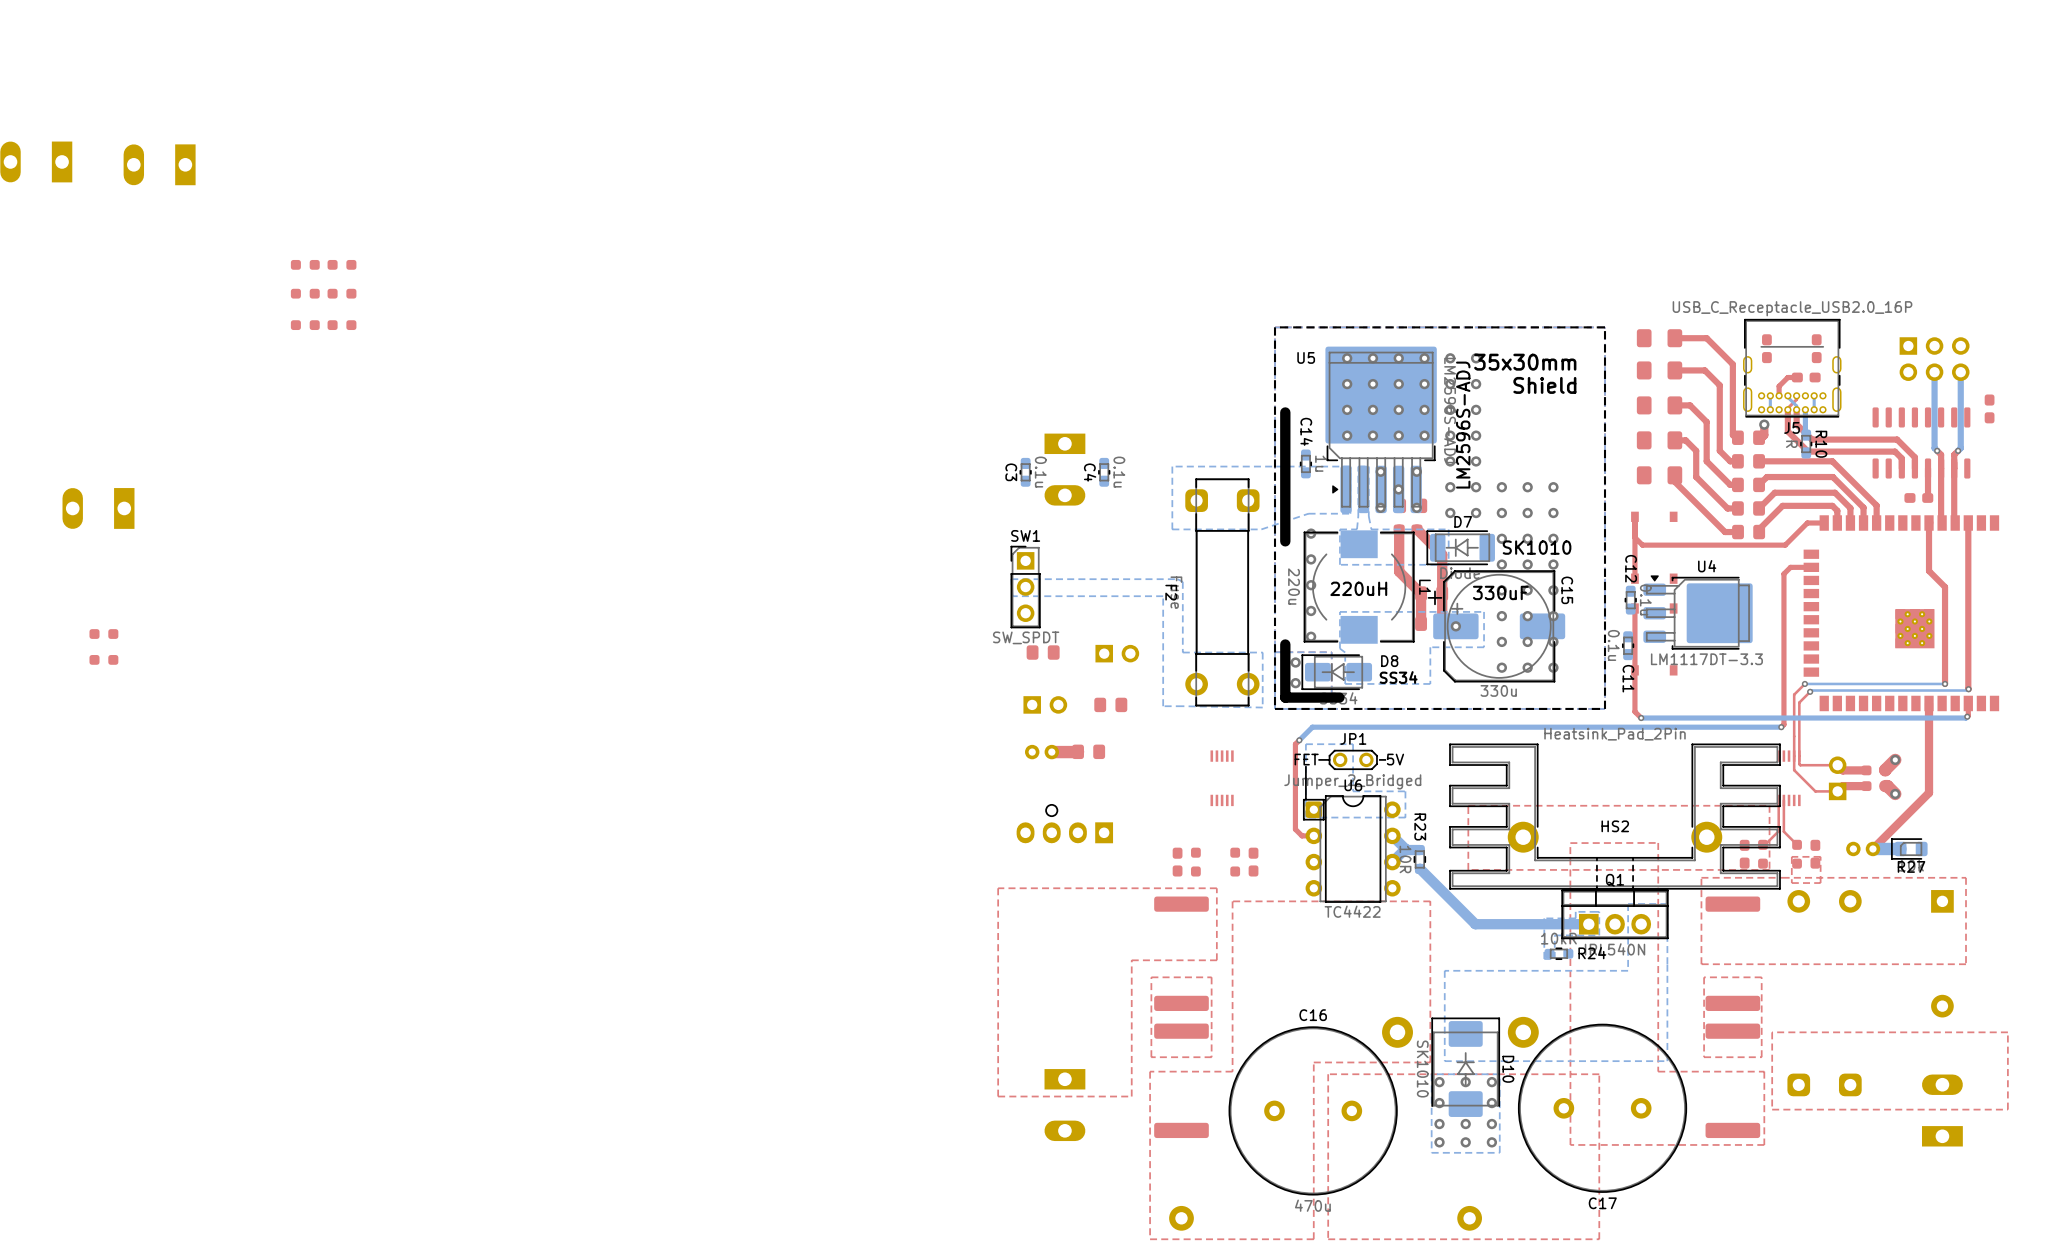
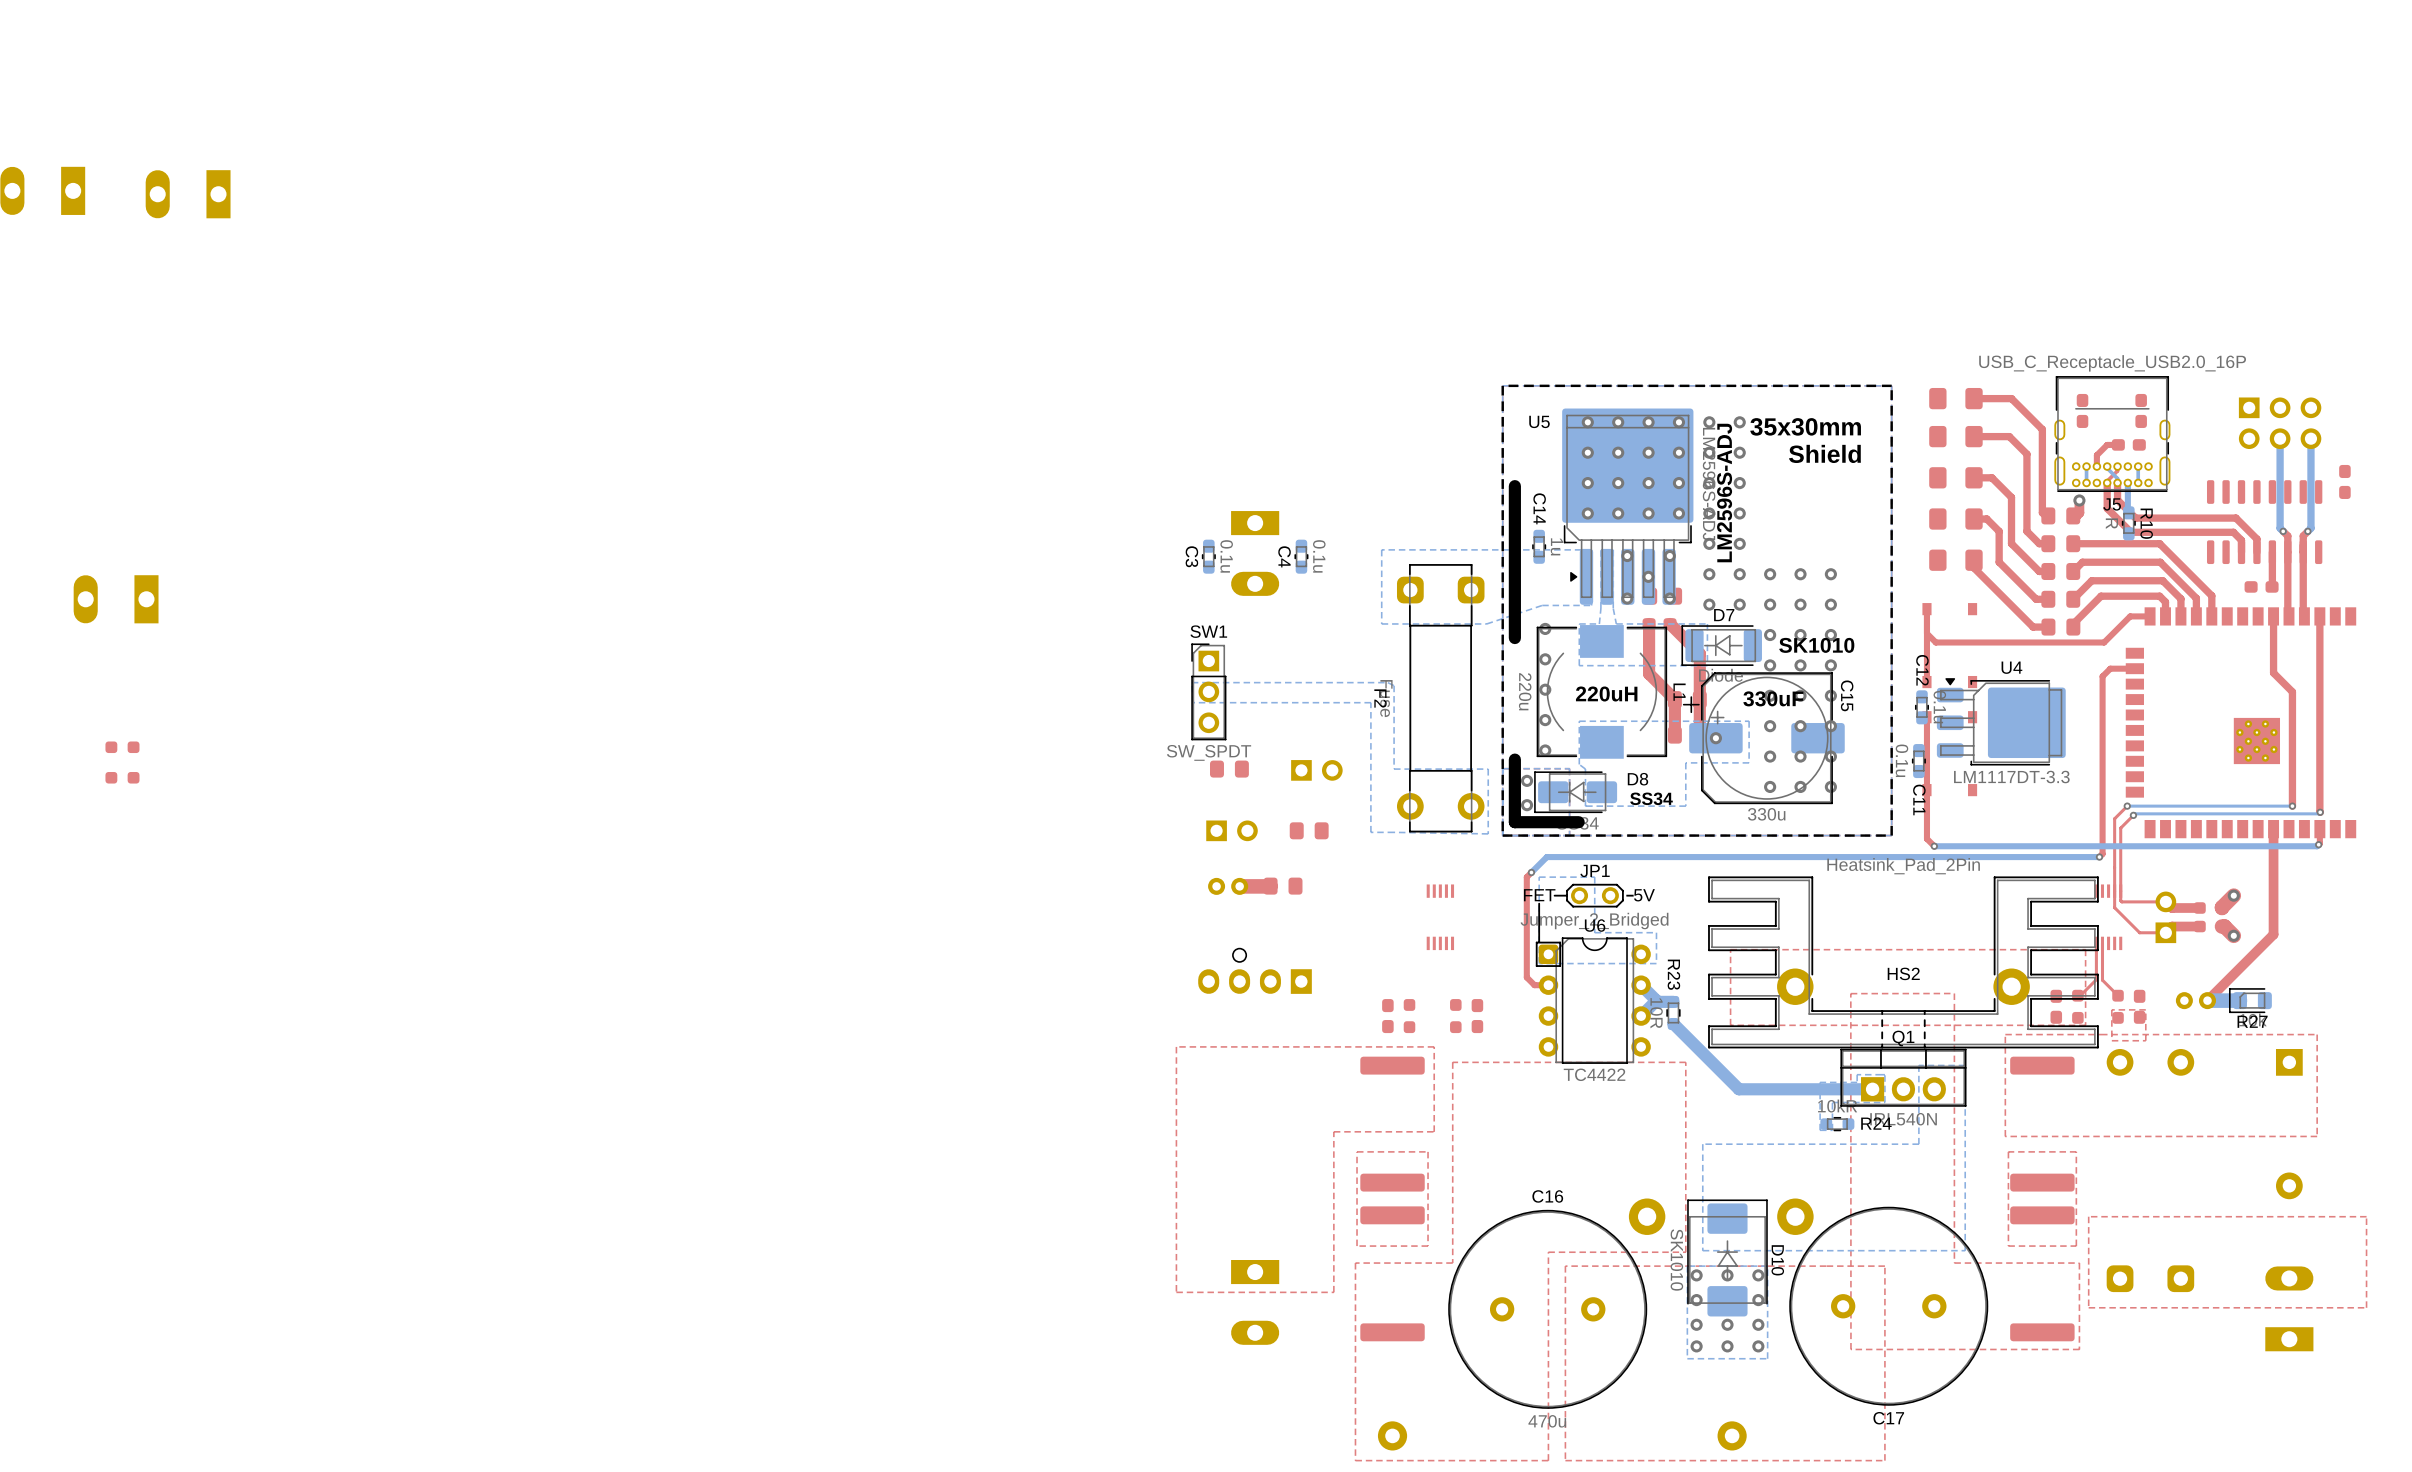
part: (305, 264) -> none
part: (341, 264) -> none
part: (305, 293) -> none
part: (341, 293) -> none
part: (305, 325) -> none
part: (341, 325) -> none

